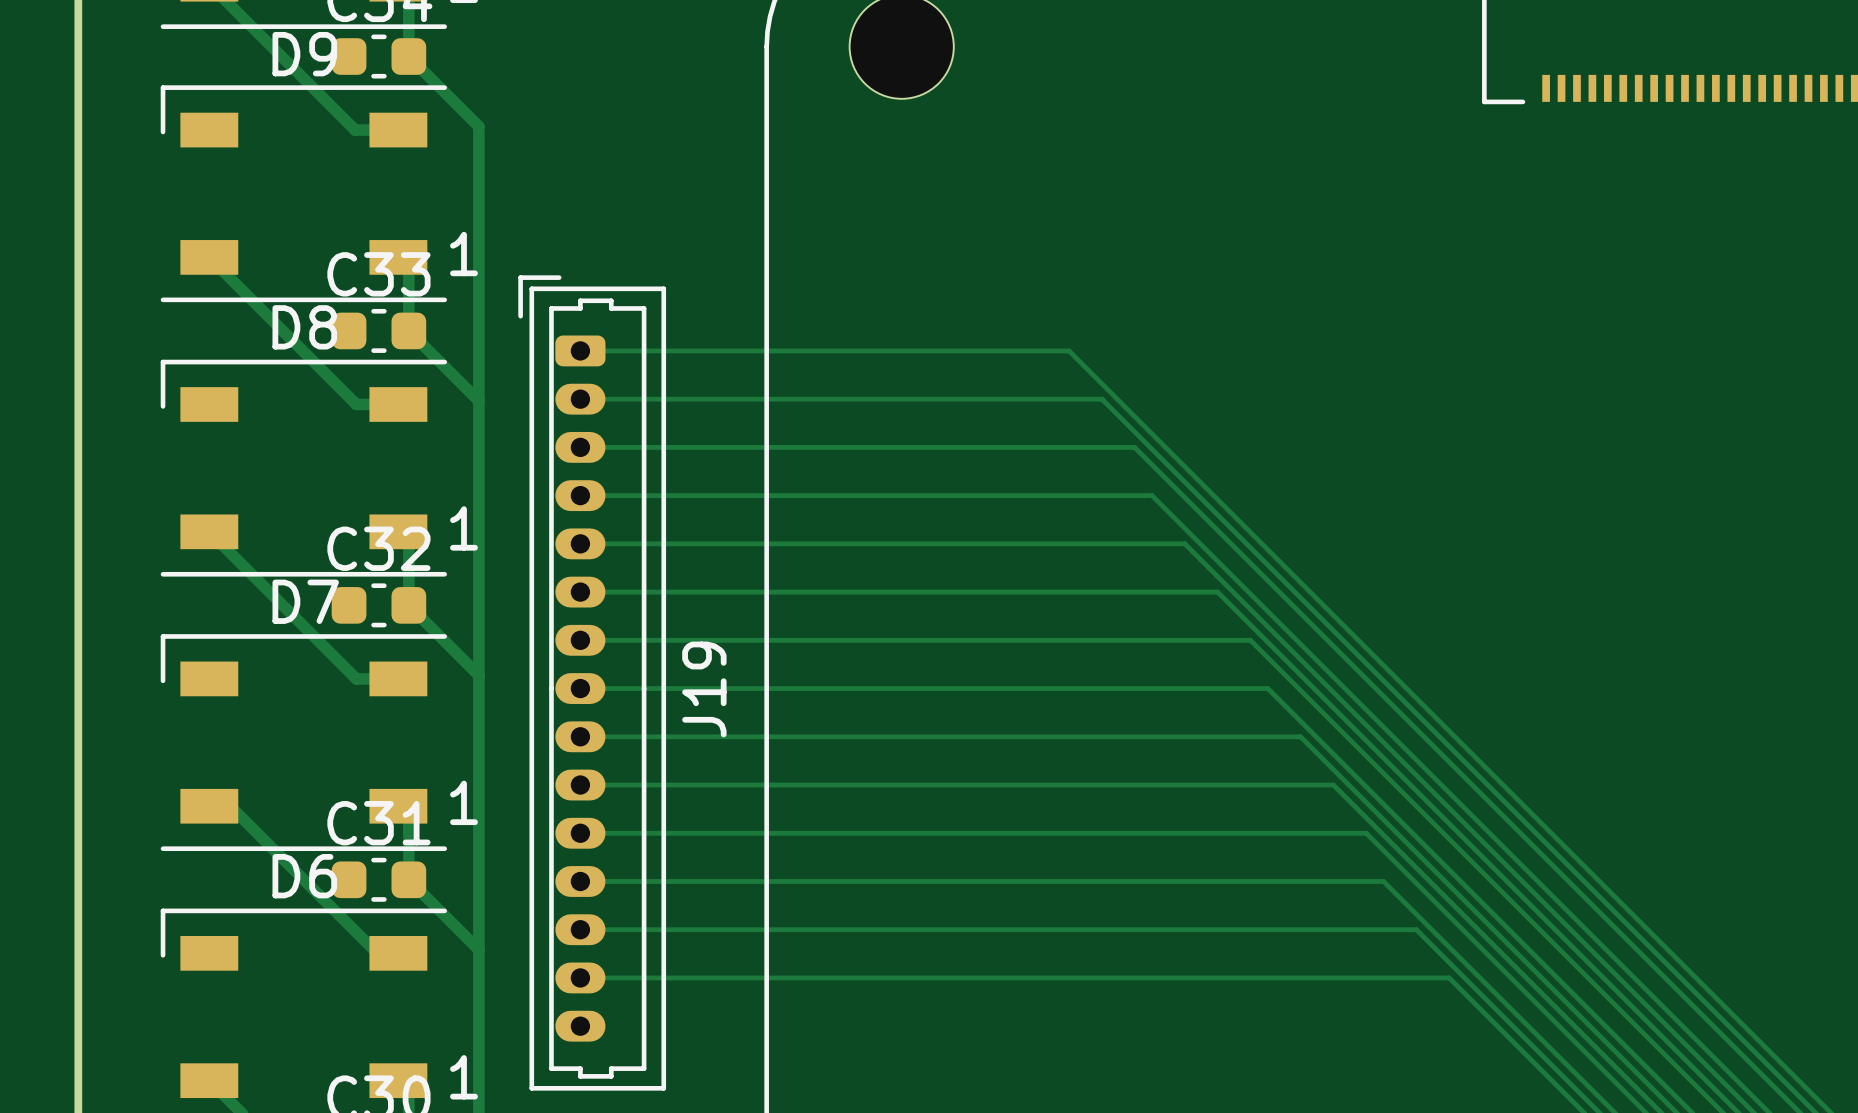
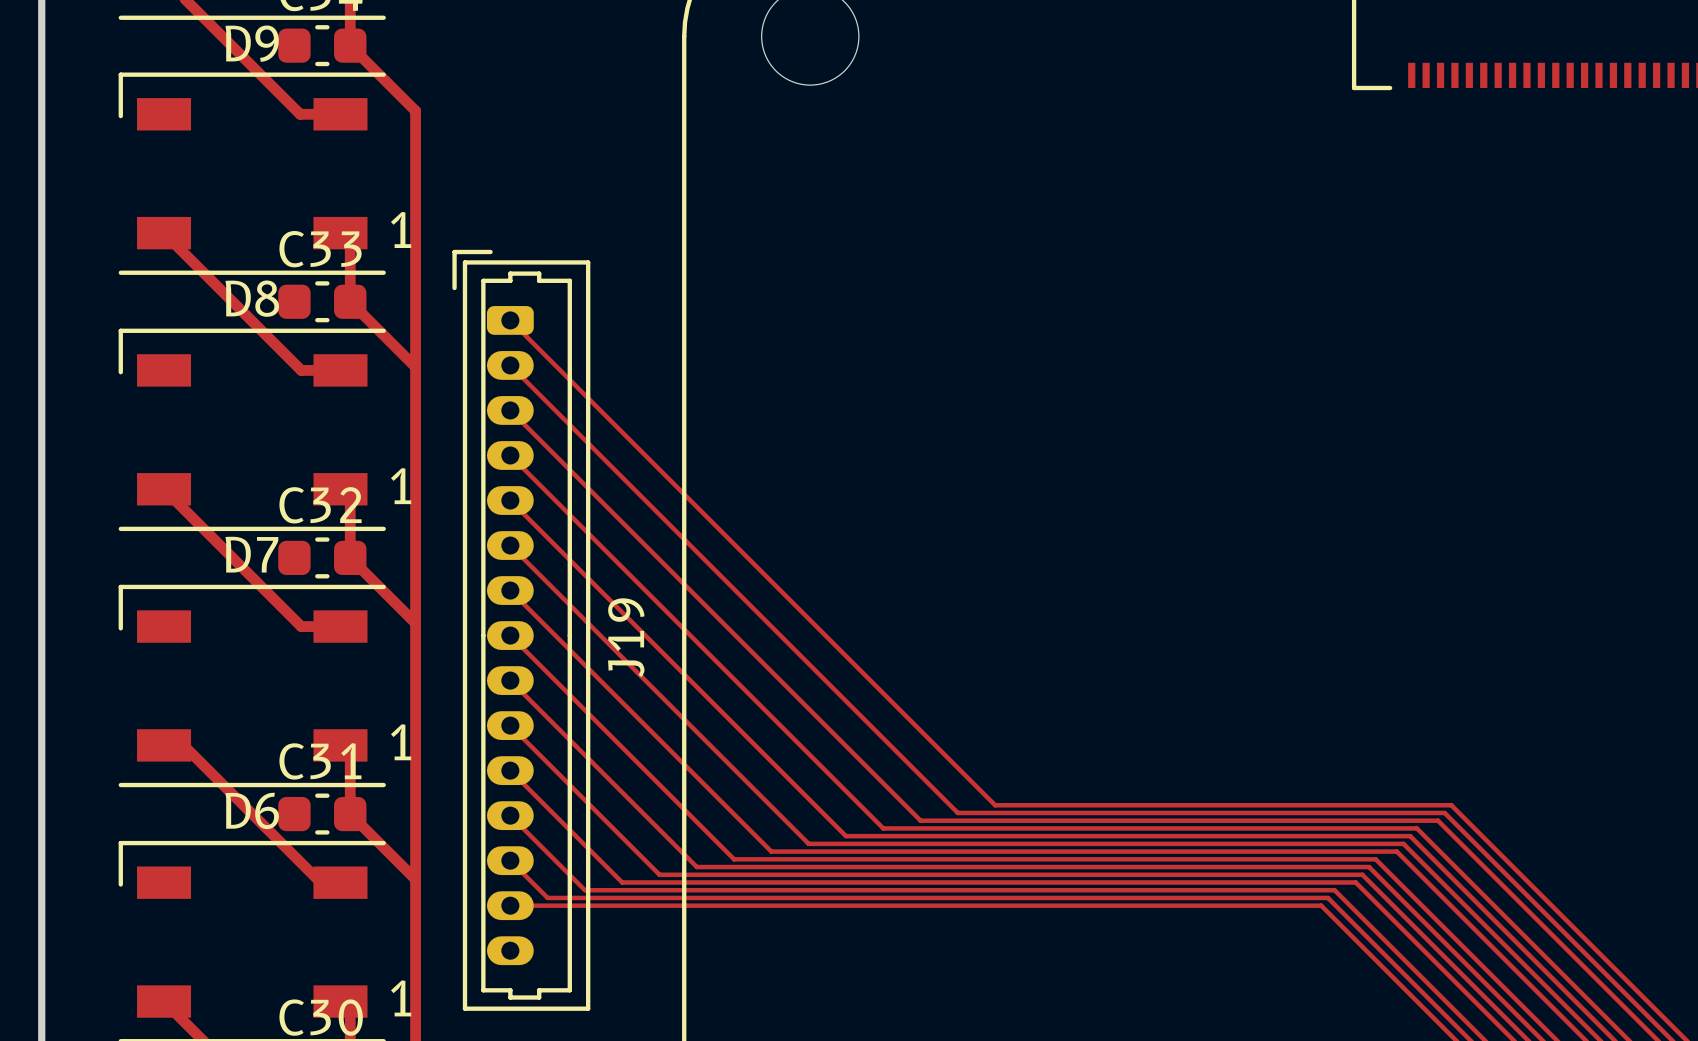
track: (580, 350) (1069, 350) (1588, 870) -> (510, 320) (995, 805) (1451, 805)
track: (580, 399) (1101, 399) (1581, 878) -> (510, 365) (957, 812) (1444, 812)
track: (580, 447) (1134, 447) (1574, 886) -> (510, 410) (920, 820) (1438, 820)
track: (580, 495) (1152, 495) (1551, 895) -> (510, 455) (883, 828) (1416, 828)
track: (580, 543) (1184, 543) (1544, 903) -> (510, 500) (846, 836) (1410, 836)
track: (580, 592) (1217, 592) (1537, 911) -> (510, 545) (808, 843) (1403, 843)
track: (580, 640) (1250, 640) (1530, 920) -> (510, 590) (771, 851) (1396, 851)
track: (580, 688) (1267, 688) (1507, 928) -> (510, 635) (734, 859) (1375, 859)
track: (580, 736) (1300, 736) (1500, 936) -> (510, 680) (696, 867) (1369, 867)
track: (580, 785) (1333, 785) (1493, 944) -> (510, 725) (659, 874) (1362, 874)
track: (580, 833) (1366, 833) (1486, 953) -> (510, 770) (622, 882) (1355, 882)
track: (580, 881) (1383, 881) (1463, 961) -> (510, 815) (584, 890) (1334, 890)
track: (580, 929) (1416, 929) (1456, 969) -> (510, 860) (547, 897) (1327, 897)

